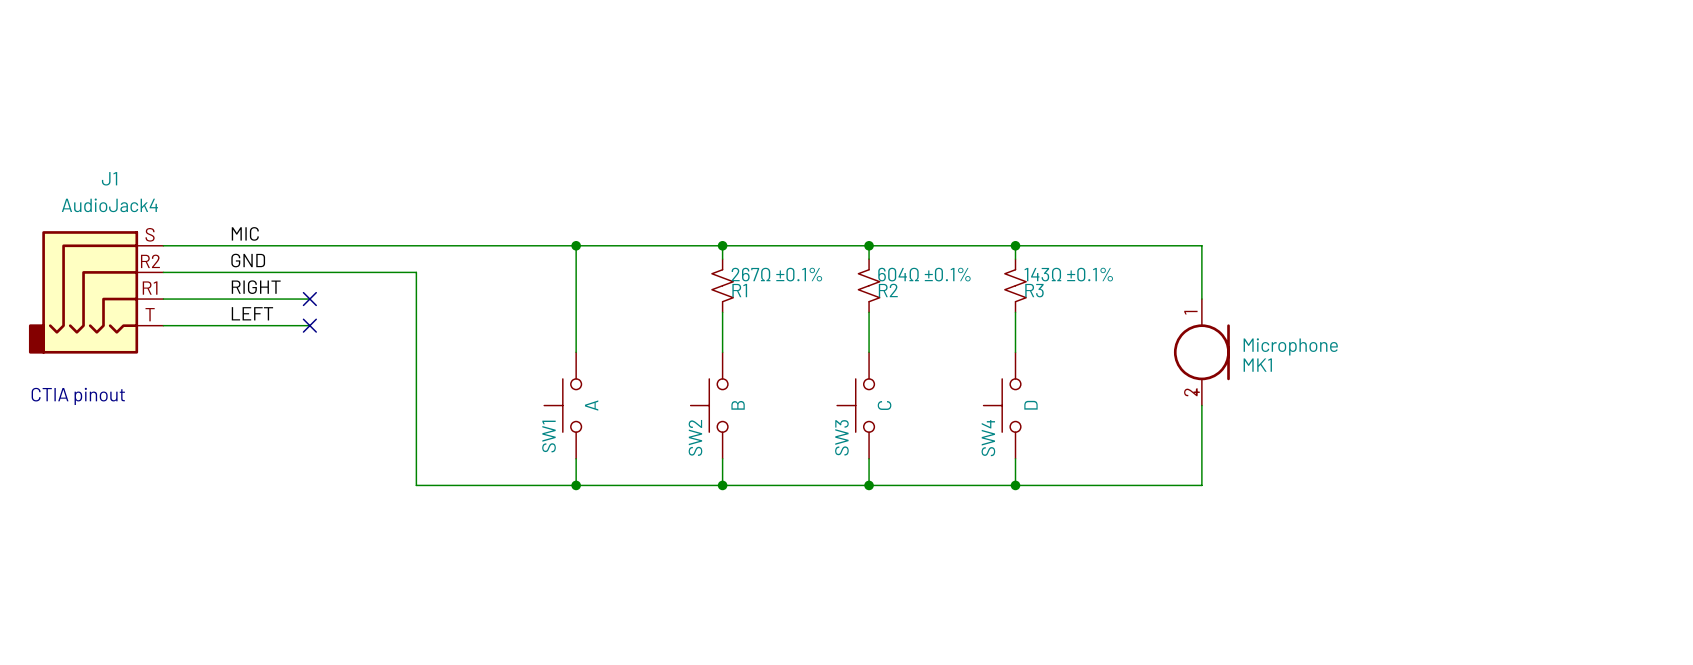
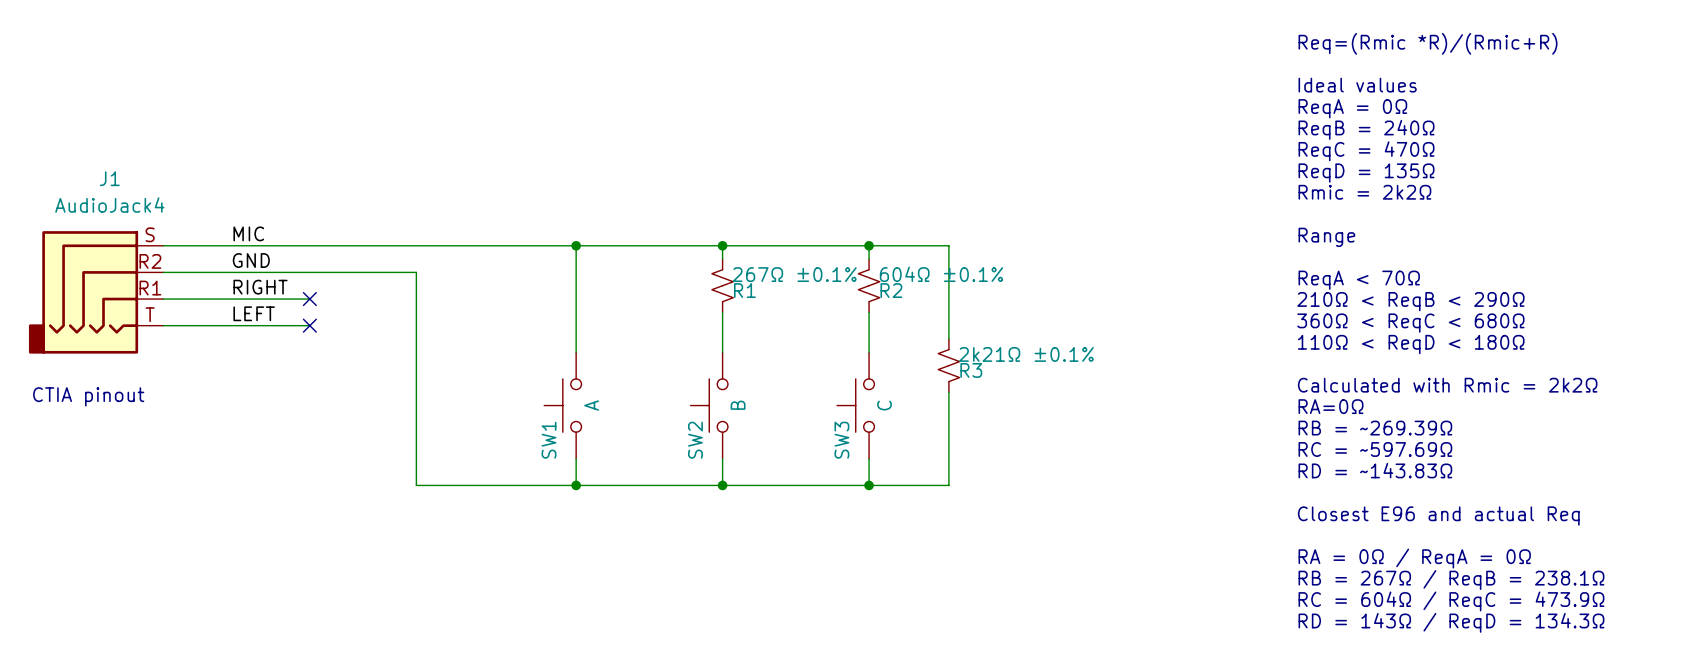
text: none -> Req=(Rmic *R)/(Rmic+R) (1428, 43)
text: none -> Ideal values (1357, 85)
text: none -> ReqA = 0Ω (1352, 108)
text: none -> ReqB = 240Ω (1366, 129)
text: none -> ReqC = 470Ω (1366, 151)
text: none -> ReqD = 135Ω (1366, 173)
text: none -> Rmic = 2k2Ω (1364, 192)
text: none -> Range (1326, 237)
wire: (948, 245) (1201, 245) (1201, 299) -> (948, 245) (948, 338)
wire: (1015, 245) (1015, 259) -> none
junction: (1015, 245) -> none
R3 value: 143Ω ±0.1% (1068, 274) -> 2k21Ω ±0.1% (1026, 354)
text: none -> ReqA < 70Ω (1359, 280)
R3 position: (1015, 285) -> (948, 365)
text: none -> 210Ω < ReqB < 290Ω (1410, 301)
wire: (1015, 312) (1015, 352) -> none
text: none -> 360Ω < ReqC < 680Ω (1410, 323)
text: none -> 110Ω < ReqD < 180Ω (1411, 344)
MK1: Microphone (1201, 352) -> none
text: none -> Calculated with Rmic = 2k2Ω (1447, 385)
SW4: D (1002, 405) -> none
wire: (1201, 405) (1201, 485) (948, 485) -> (948, 392) (948, 485)
text: none -> RA=0Ω (1331, 406)
text: none -> RB = ~269.39Ω (1375, 428)
text: none -> RC = ~597.69Ω (1375, 449)
wire: (1015, 458) (1015, 485) -> none
text: none -> RD = ~143.83Ω (1375, 470)
junction: (1015, 485) -> none
text: none -> Closest E96 and actual Req (1438, 516)
text: none -> RA = 0Ω / ReqA = 0Ω (1414, 558)
text: none -> RB = 267Ω / ReqB = 238.1Ω (1451, 580)
text: none -> RC = 604Ω / ReqC = 473.9Ω (1451, 601)
text: none -> RD = 143Ω / ReqD = 134.3Ω (1451, 622)

